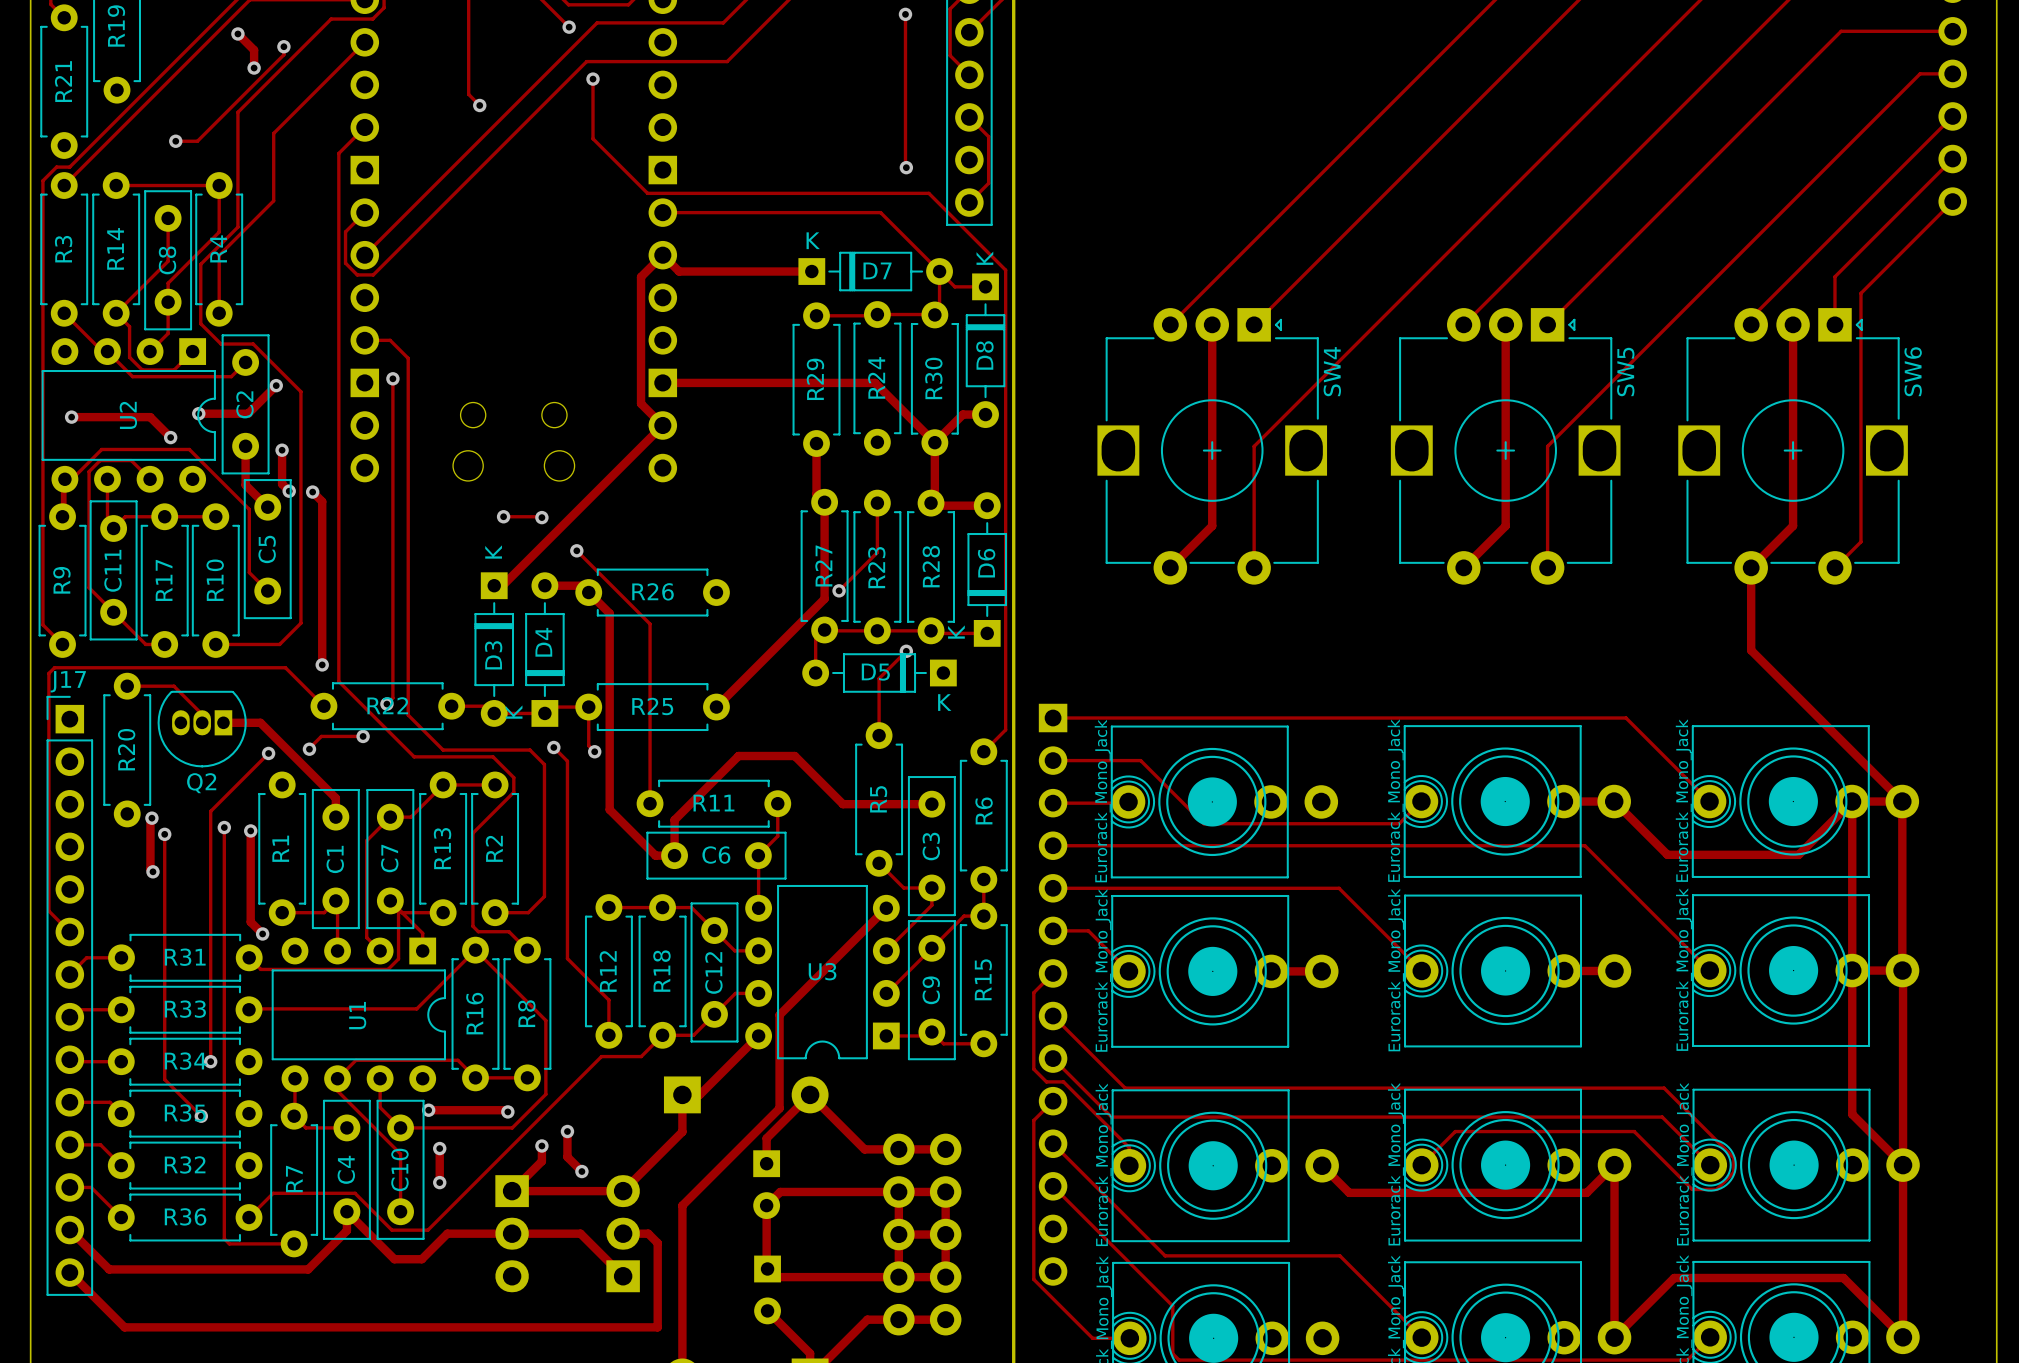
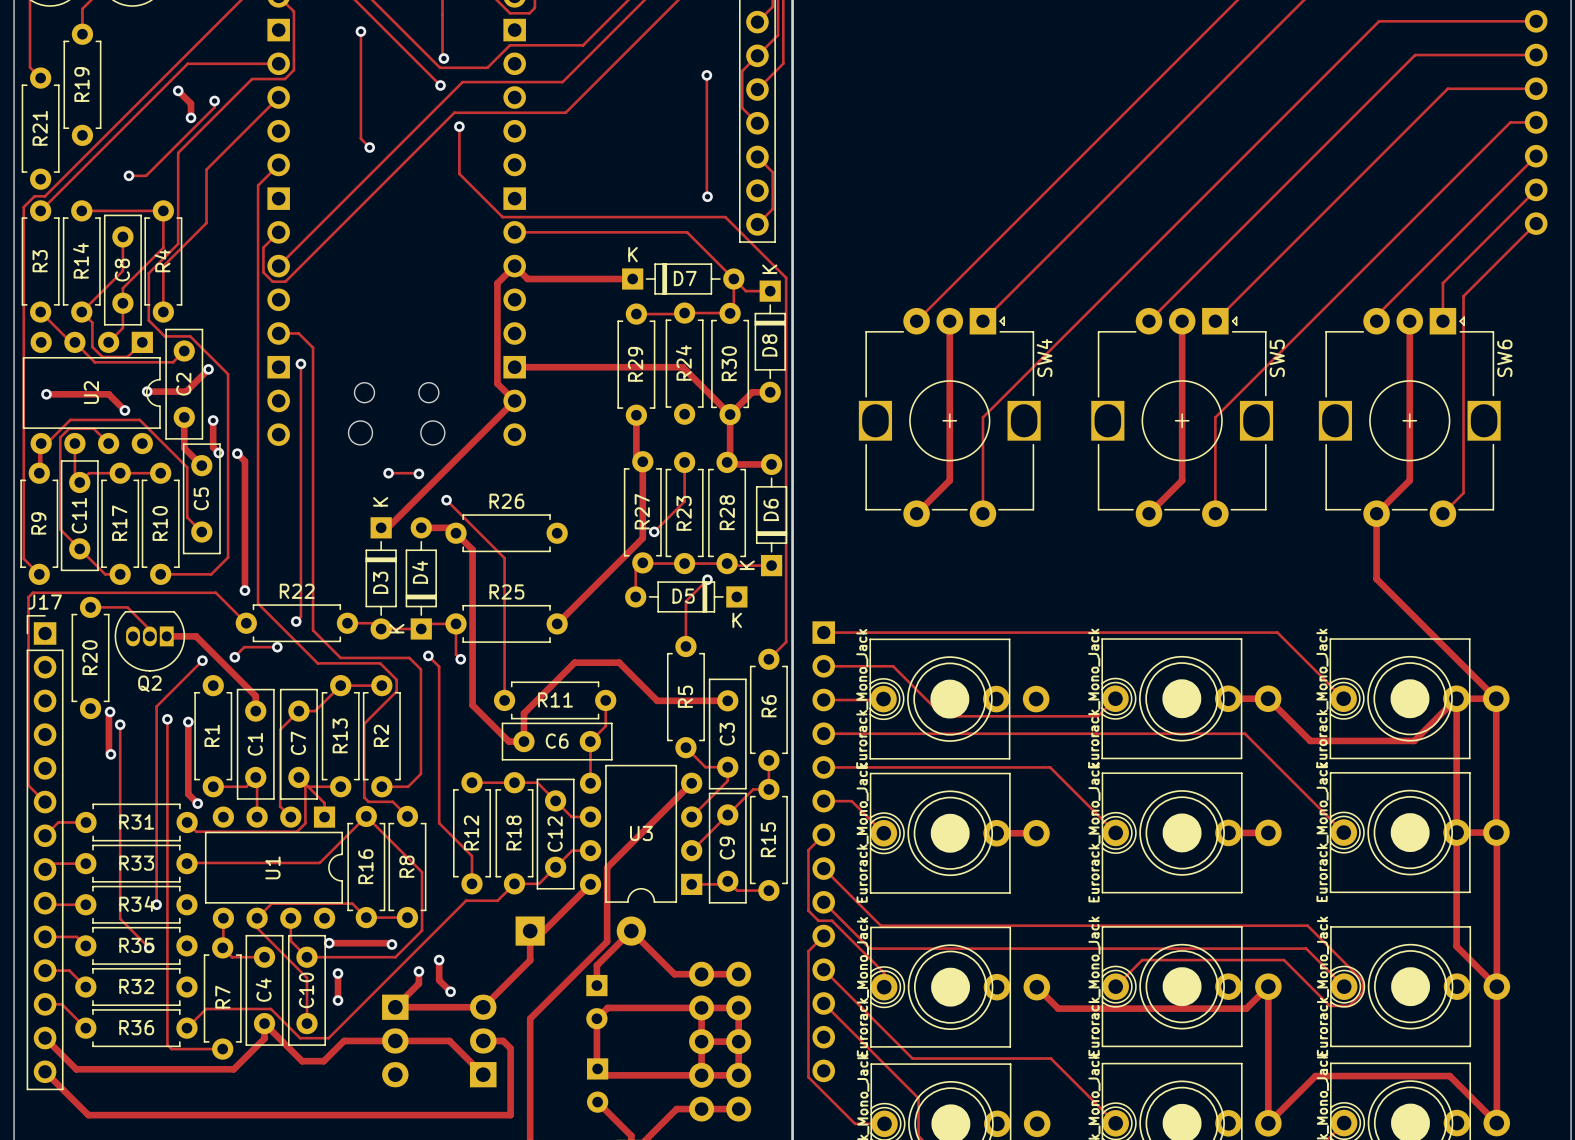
R26 name position: R26 (653, 591) -> R26 (506, 501)
R22 name position: R22 (387, 705) -> R22 (297, 591)
R25 name position: R25 (652, 706) -> R25 (506, 591)

